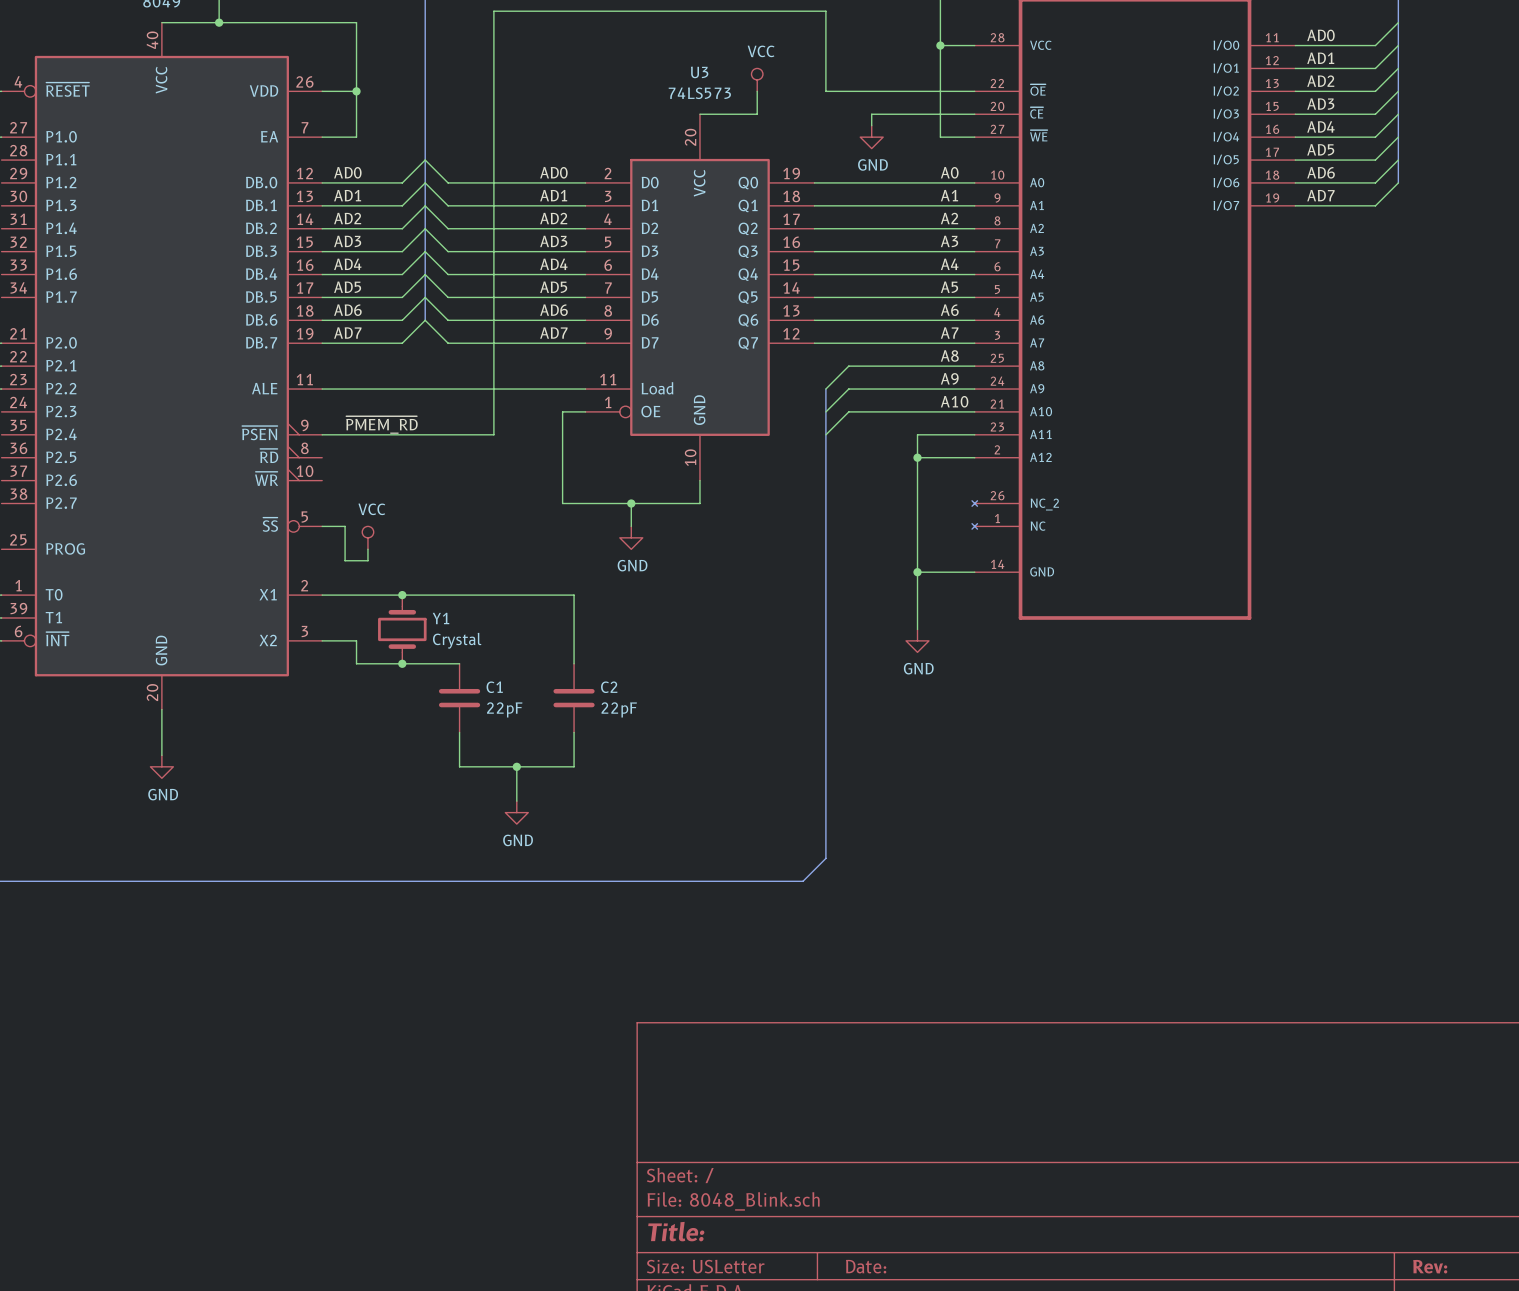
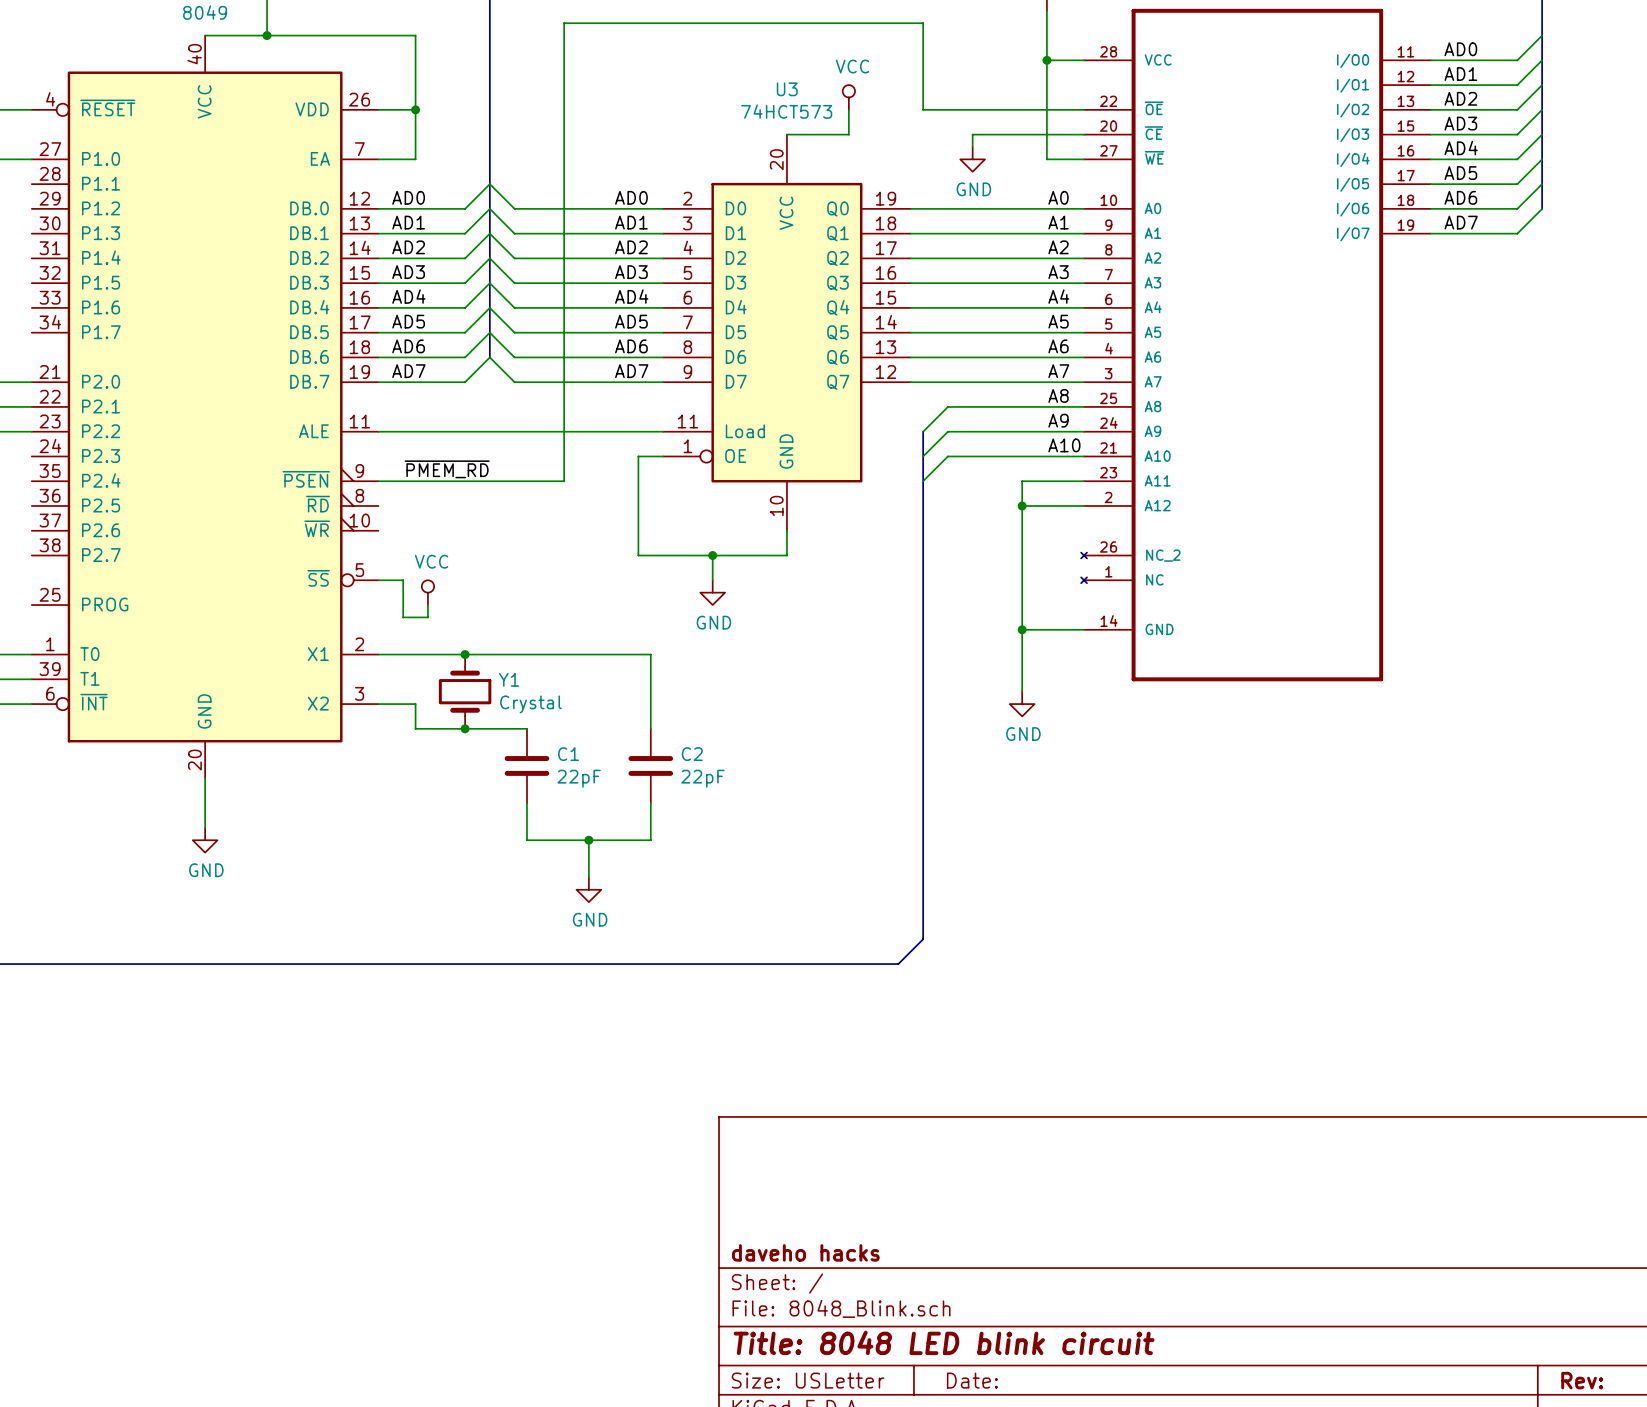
U3 value: 74LS573 (699, 93) -> 74HCT573 (786, 111)
title block: none -> daveho hacks (805, 1252)
title block: Title: (676, 1231) -> Title: 8048 LED blink circuit (944, 1342)

